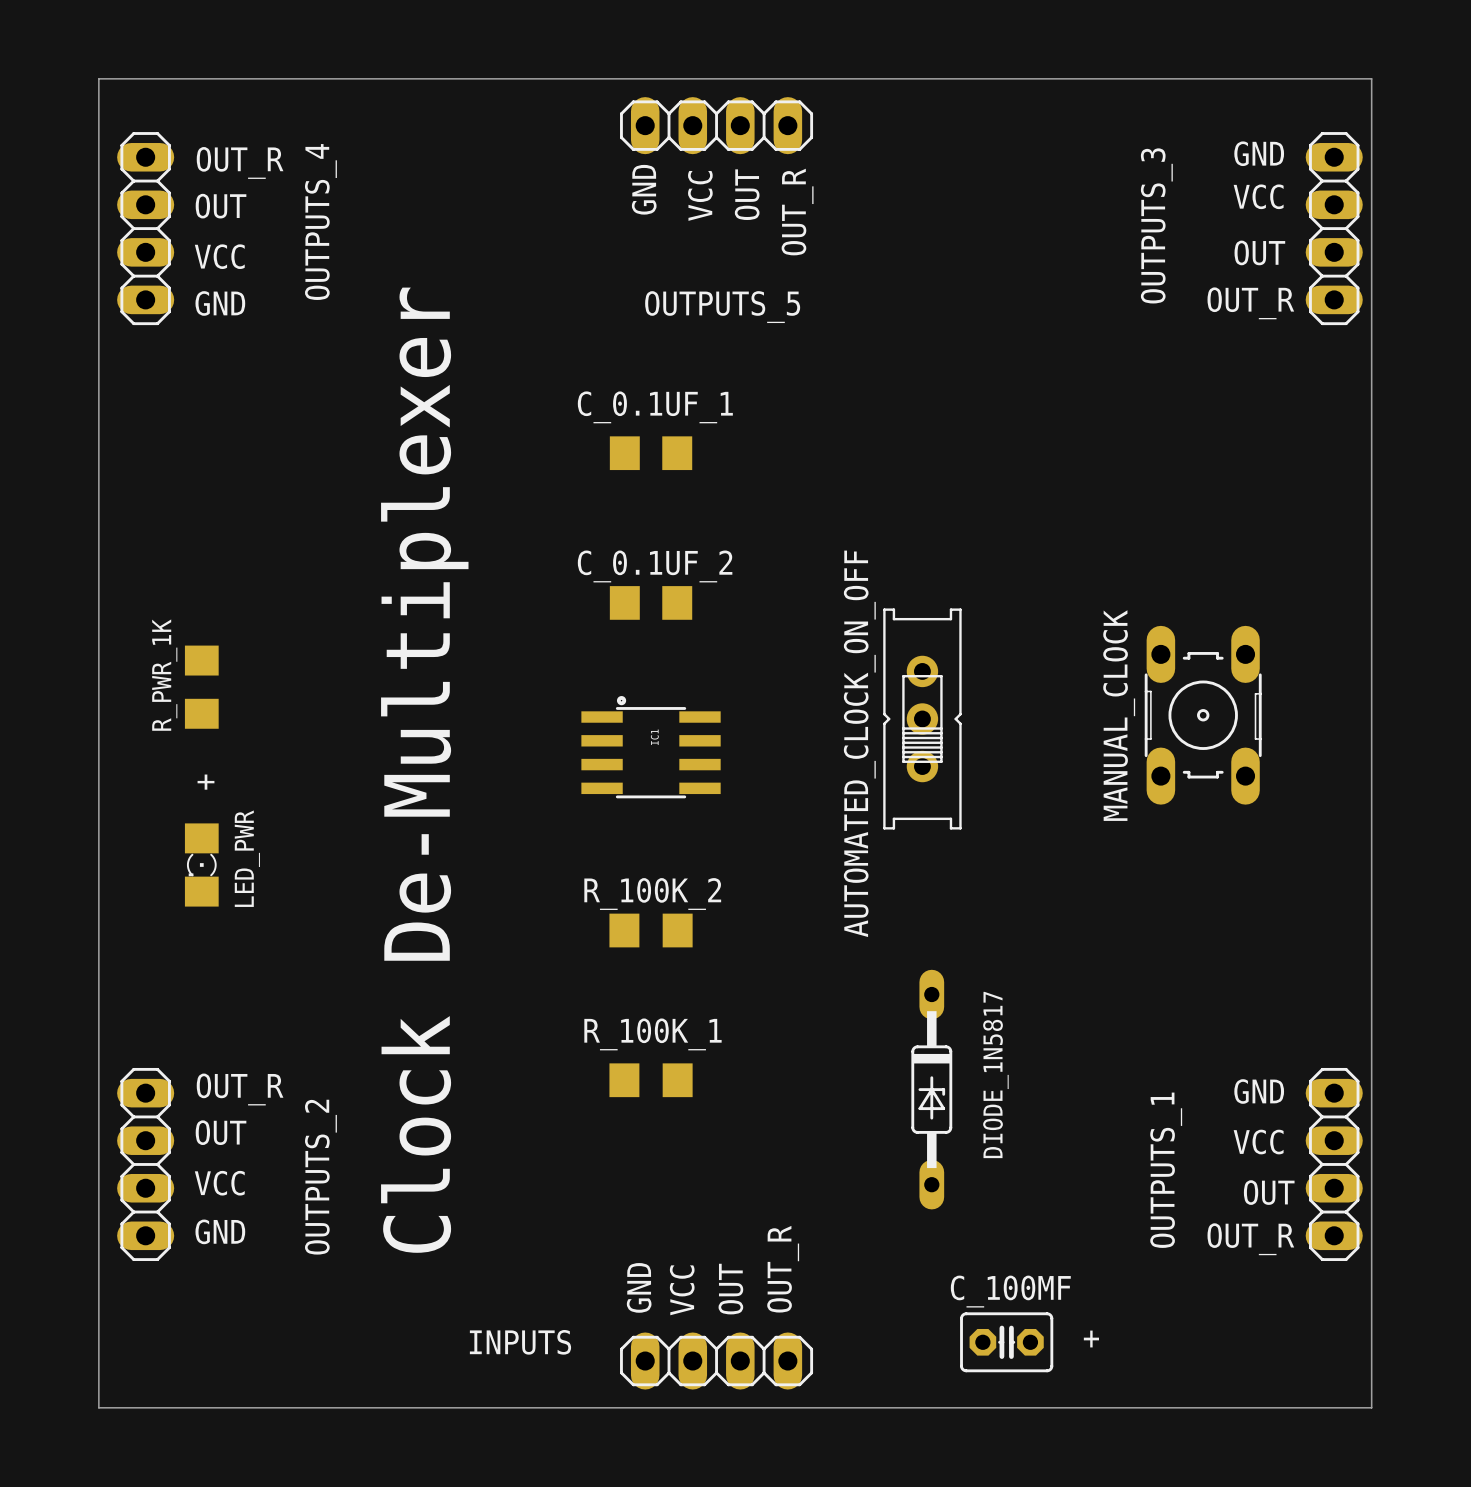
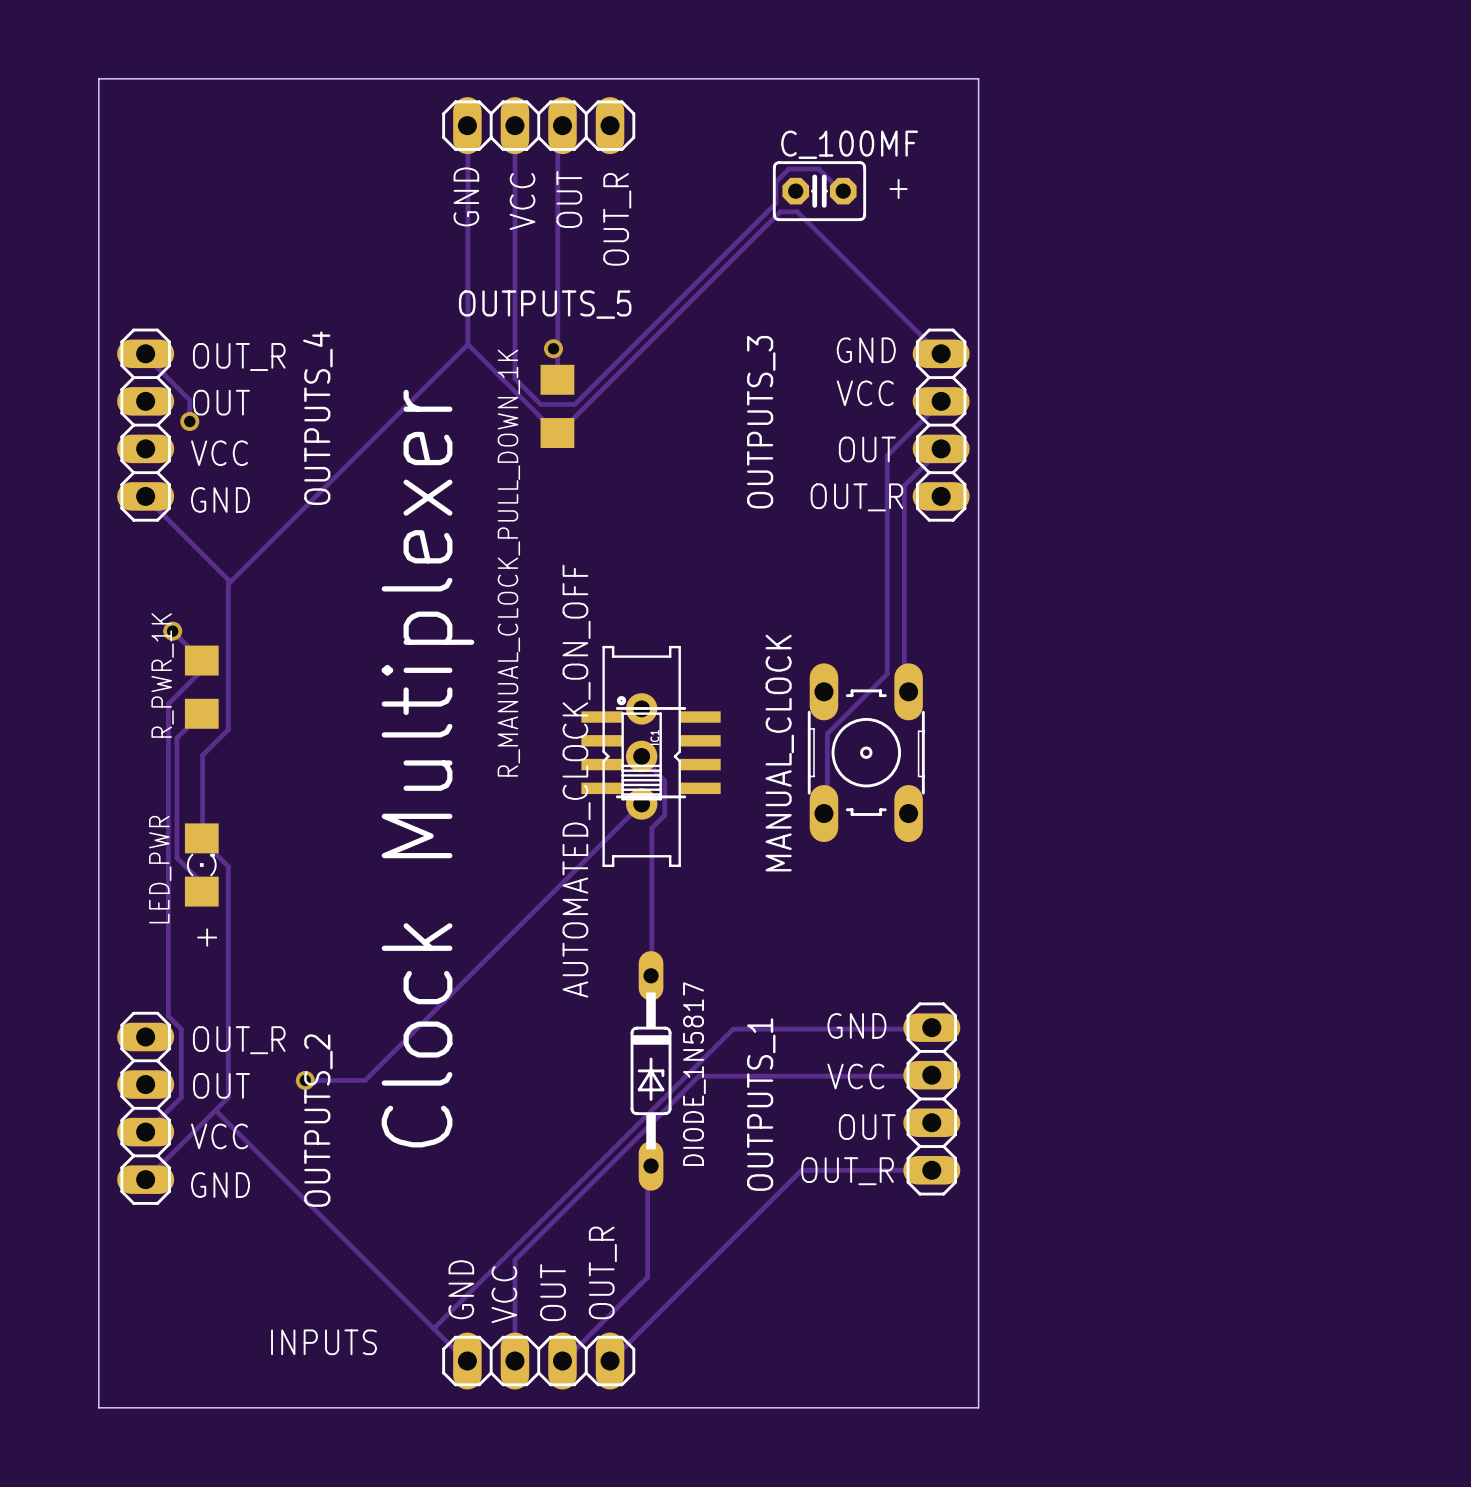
board edge: (978, 78) (1371, 78) (1371, 1407) (978, 1407) -> (978, 78) (978, 1407)
track: none -> (467, 125) (467, 344)
track: none -> (514, 125) (514, 378) (540, 404) (574, 404) (775, 203) (775, 181) (788, 169) (818, 169) (840, 190) (843, 191)
track: none -> (562, 125) (557, 130) (557, 379)
OUTPUTS_5 position: (716, 125) -> (538, 125)
text: GND (1259, 153) -> none
text: OUT_R (240, 162) -> none
text: none -> + (898, 189)
text: none -> GND (466, 196)
text: GND (644, 189) -> none
text: none -> OUT (569, 199)
text: OUT (747, 194) -> none
text: none -> VCC (522, 201)
text: VCC (700, 195) -> none
text: VCC (1258, 196) -> none
text: OUT (221, 206) -> none
text: none -> OUT_R (617, 219)
text: OUT_R (797, 212) -> none
OUTPUTS_4 position: (145, 228) -> (145, 425)
OUTPUTS_3 position: (1334, 228) -> (941, 425)
text: OUT (1259, 252) -> none
text: VCC (219, 256) -> none
text: GND (220, 303) -> none
text: OUT_R (1250, 303) -> none
track: none -> (467, 344) (557, 434) (780, 211) (797, 211) (941, 353)
track: none -> (467, 344) (228, 584)
via: none -> (553, 348)
text: none -> GND (866, 350)
track: none -> (145, 353) (189, 400) (189, 421)
text: none -> OUT_R (239, 357)
text: none -> VCC (865, 393)
track: none -> (941, 401) (887, 455) (887, 673) (827, 733) (827, 810) (823, 813)
text: none -> OUT (221, 402)
R_MANUAL_CLOCK_PULL_DOWN_1K: none -> (557, 406)
via: none -> (189, 421)
track: none -> (941, 448) (904, 485) (904, 691) (908, 691)
text: none -> OUT (867, 449)
text: none -> VCC (219, 453)
C_0.1UF_1: (651, 453) -> none
track: none -> (145, 496) (228, 579) (228, 729) (202, 755) (201, 838) (228, 866) (228, 1097) (145, 1179)
text: none -> OUT_R (856, 497)
text: none -> GND (220, 499)
C_0.1UF_2: (651, 602) -> none
track: none -> (172, 631) (201, 660) (198, 661) (198, 673) (168, 703) (168, 1016) (181, 1029) (181, 1097) (145, 1132)
via: none -> (172, 631)
track: none -> (201, 713) (176, 738) (176, 857) (198, 879) (198, 887) (201, 891)
MANUAL_CLOCK position: (1203, 715) -> (866, 752)
AUTOMATED_CLOCK_ON_OFF position: (922, 718) -> (641, 756)
track: none -> (641, 756) (664, 780) (664, 815) (651, 827) (651, 975)
text: Clock De-Multiplexer (424, 770) -> Clock Multiplexer (427, 768)
text position: + (205, 782) -> + (207, 937)
track: none -> (641, 803) (365, 1080) (305, 1080)
LED_PWR rotation: 0° (201, 864) -> 180° (201, 864)
R_100K_2: (651, 930) -> none
text: none -> GND (856, 1025)
track: none -> (931, 1027) (733, 1029) (433, 1328)
DIODE_1N5817 name position: DIODE_1N5817 (995, 1074) -> DIODE_1N5817 (694, 1074)
track: none -> (931, 1075) (698, 1076) (514, 1260) (514, 1361)
text: none -> VCC (855, 1076)
via: none -> (305, 1080)
R_100K_1: (651, 1080) -> none
text position: OUT_R (240, 1089) -> OUT_R (239, 1040)
DIODE_1N5817 position: (931, 1089) -> (651, 1070)
text: GND (1259, 1091) -> none
track: none -> (215, 1110) (467, 1361)
text: none -> OUT (867, 1127)
text position: OUT (221, 1132) -> OUT (221, 1085)
text: VCC (1258, 1142) -> none
OUTPUTS_2 position: (145, 1164) -> (145, 1108)
OUTPUTS_1 position: (1334, 1164) -> (931, 1098)
track: none -> (651, 1165) (647, 1166) (647, 1277) (562, 1361)
track: none -> (931, 1170) (801, 1170) (610, 1361)
text position: VCC (219, 1183) -> VCC (219, 1136)
text: OUT (1269, 1192) -> none
text position: GND (220, 1231) -> GND (220, 1185)
text: OUT_R (1250, 1239) -> none
text rotation: 0° (783, 1269) -> 90° clockwise (847, 1171)
text: none -> OUT_R (602, 1272)
text: GND (639, 1287) -> none
text: OUT (730, 1289) -> none
text: VCC (682, 1290) -> none
C_100MF name position: C_100MF (1010, 1291) -> C_100MF (849, 144)
text: none -> GND (461, 1289)
text: none -> OUT (553, 1292)
text: none -> VCC (504, 1294)
text: + (1091, 1339) -> none
text position: INPUTS (520, 1342) -> INPUTS (323, 1342)
C_100MF position: (1006, 1342) -> (819, 191)
part position: (716, 1361) -> (538, 1361)

